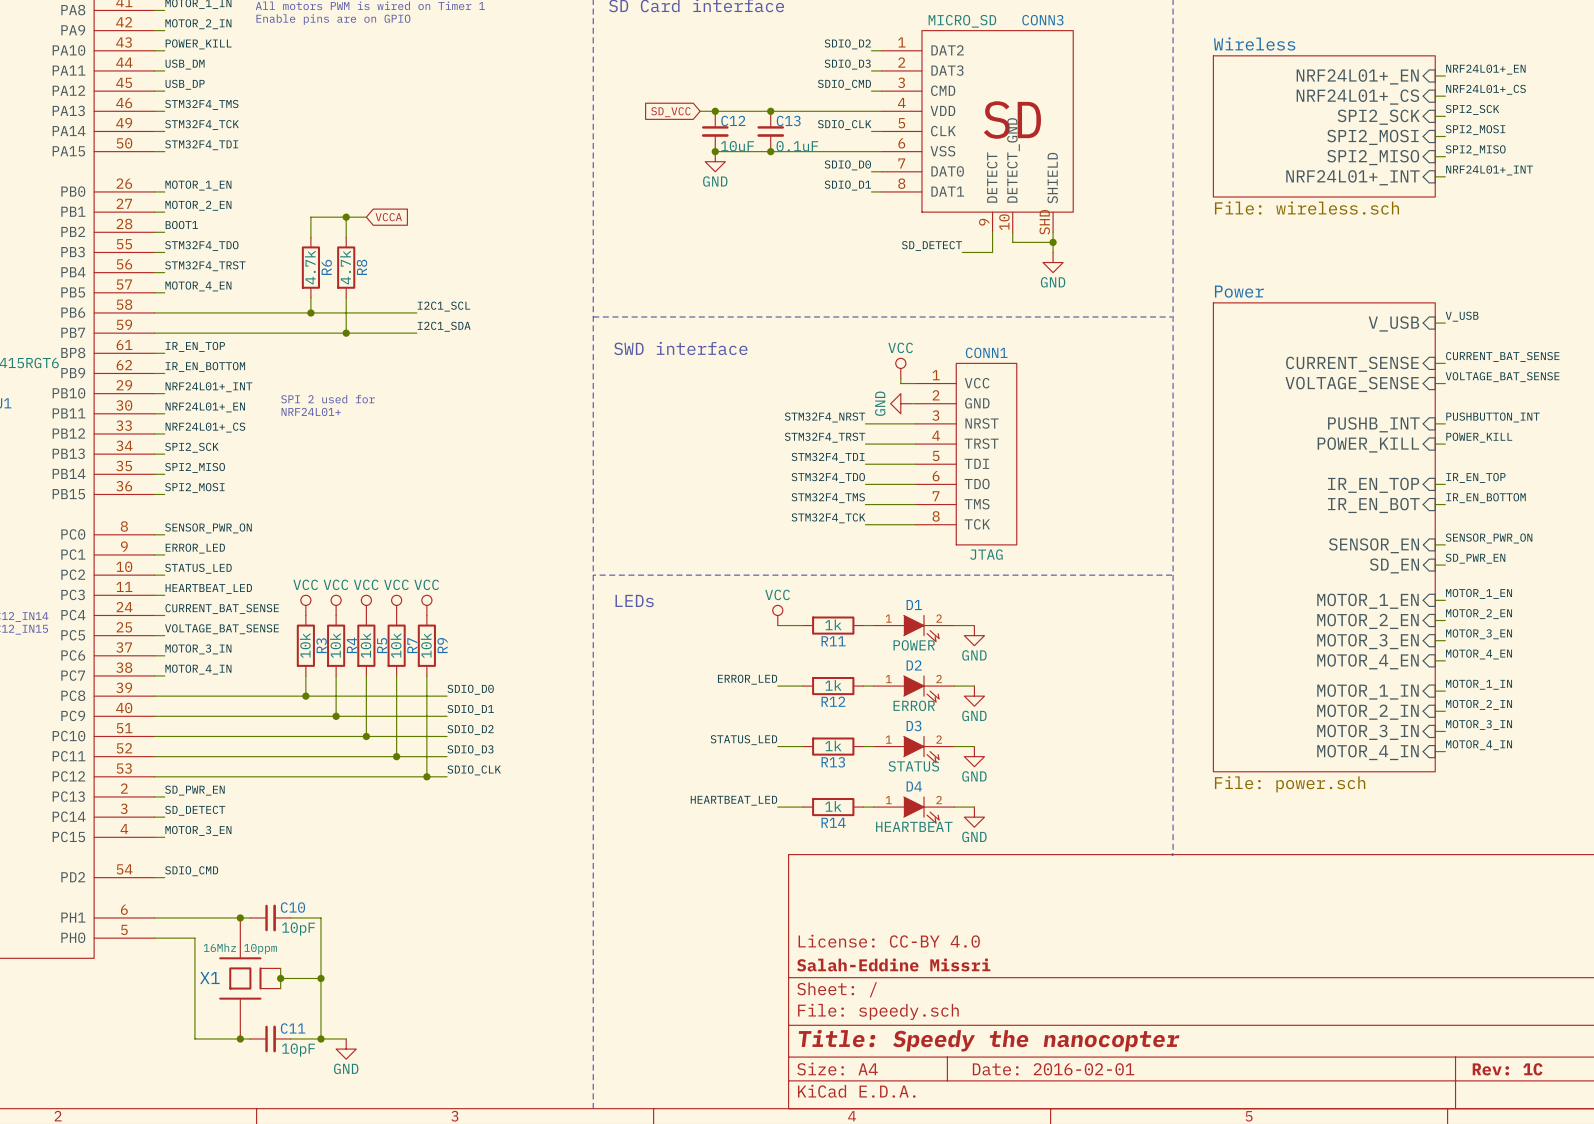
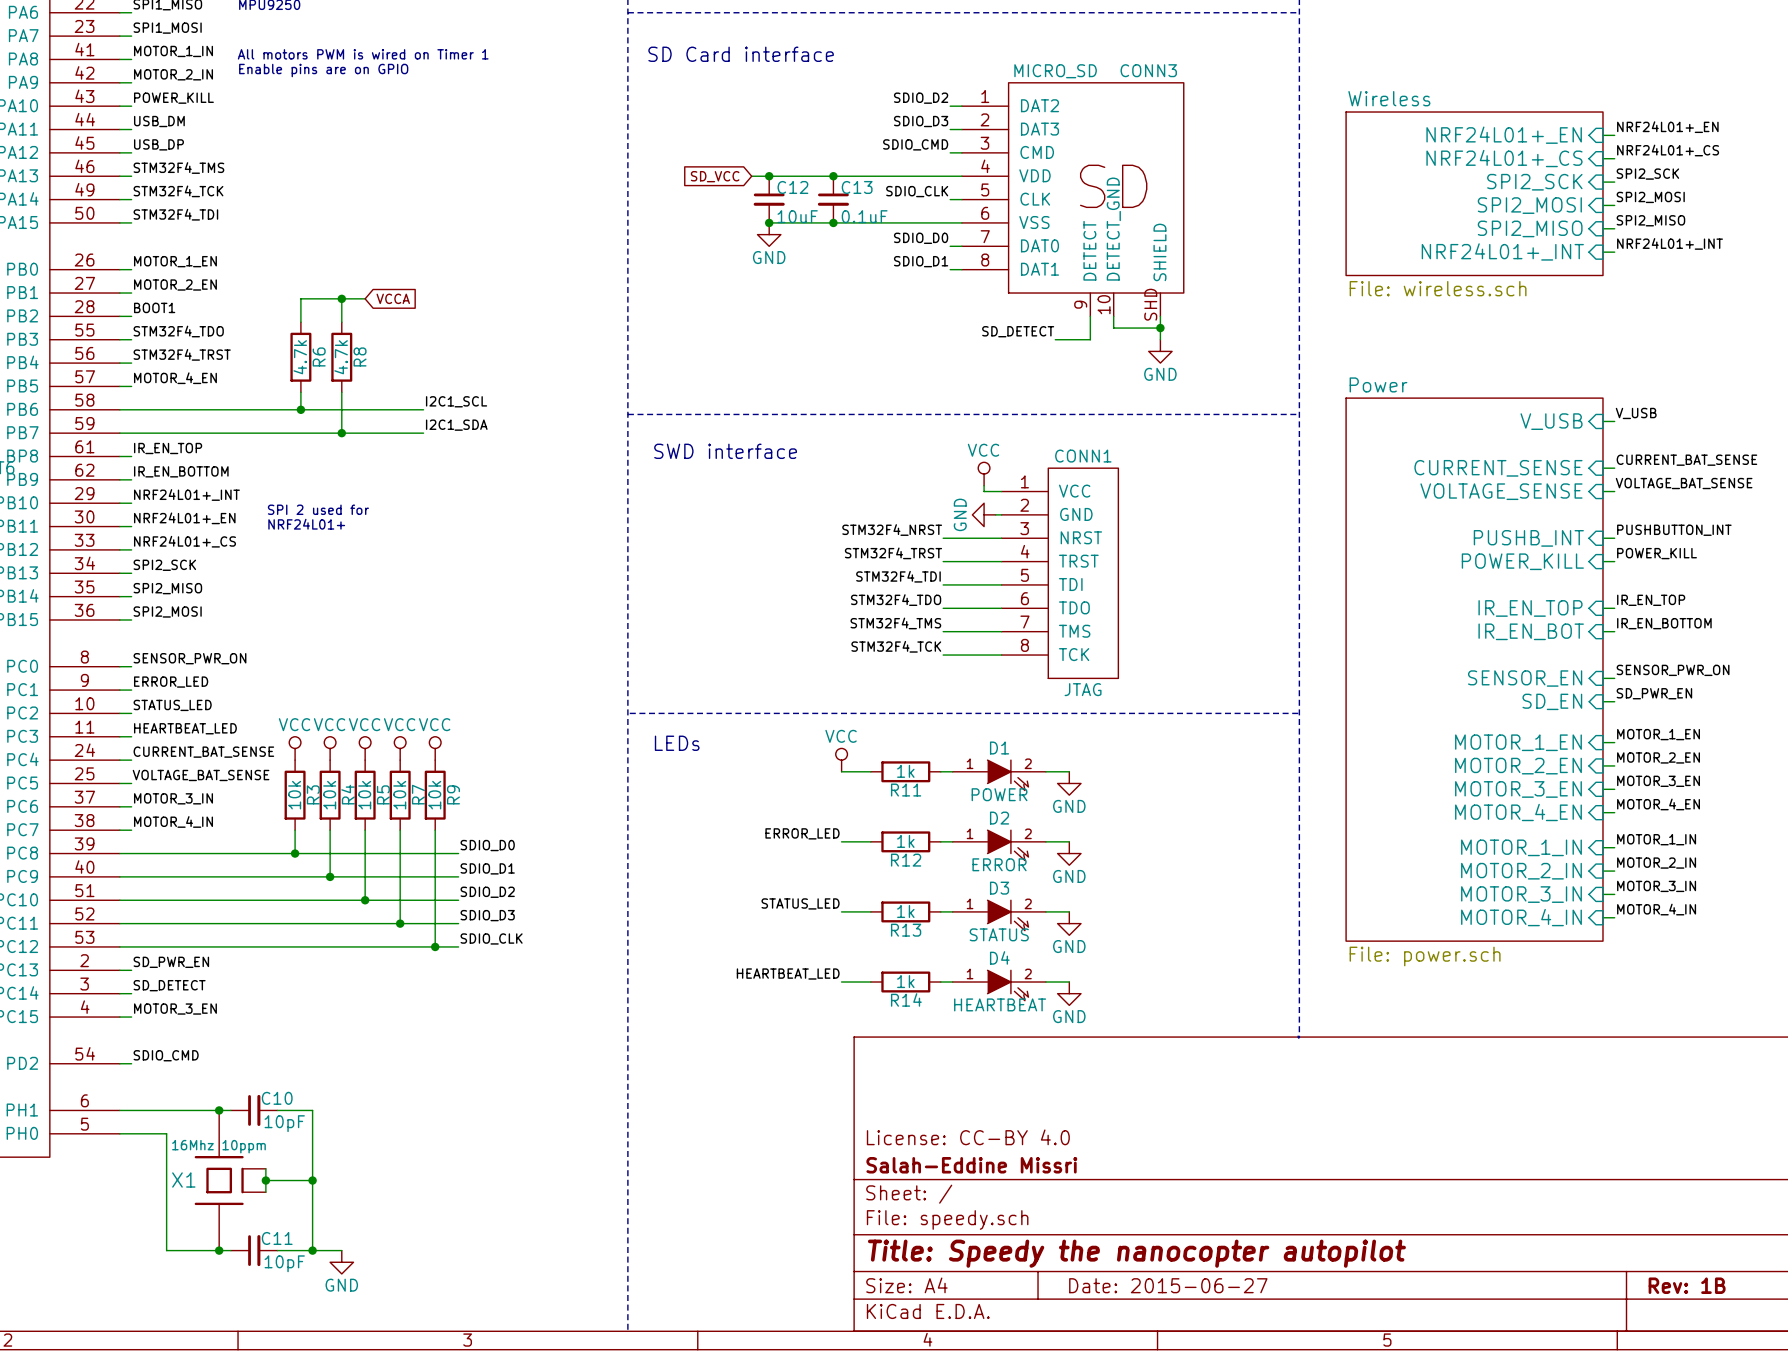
title block: Title: Speedy the nanocopter (989, 1040) -> Title: Speedy the nanocopter autopilot (1136, 1253)
title block: Date: 2016-02-01 (1053, 1069) -> Date: 2015-06-27 (1168, 1285)
title block: Rev: 1C (1507, 1069) -> Rev: 1B (1687, 1285)

